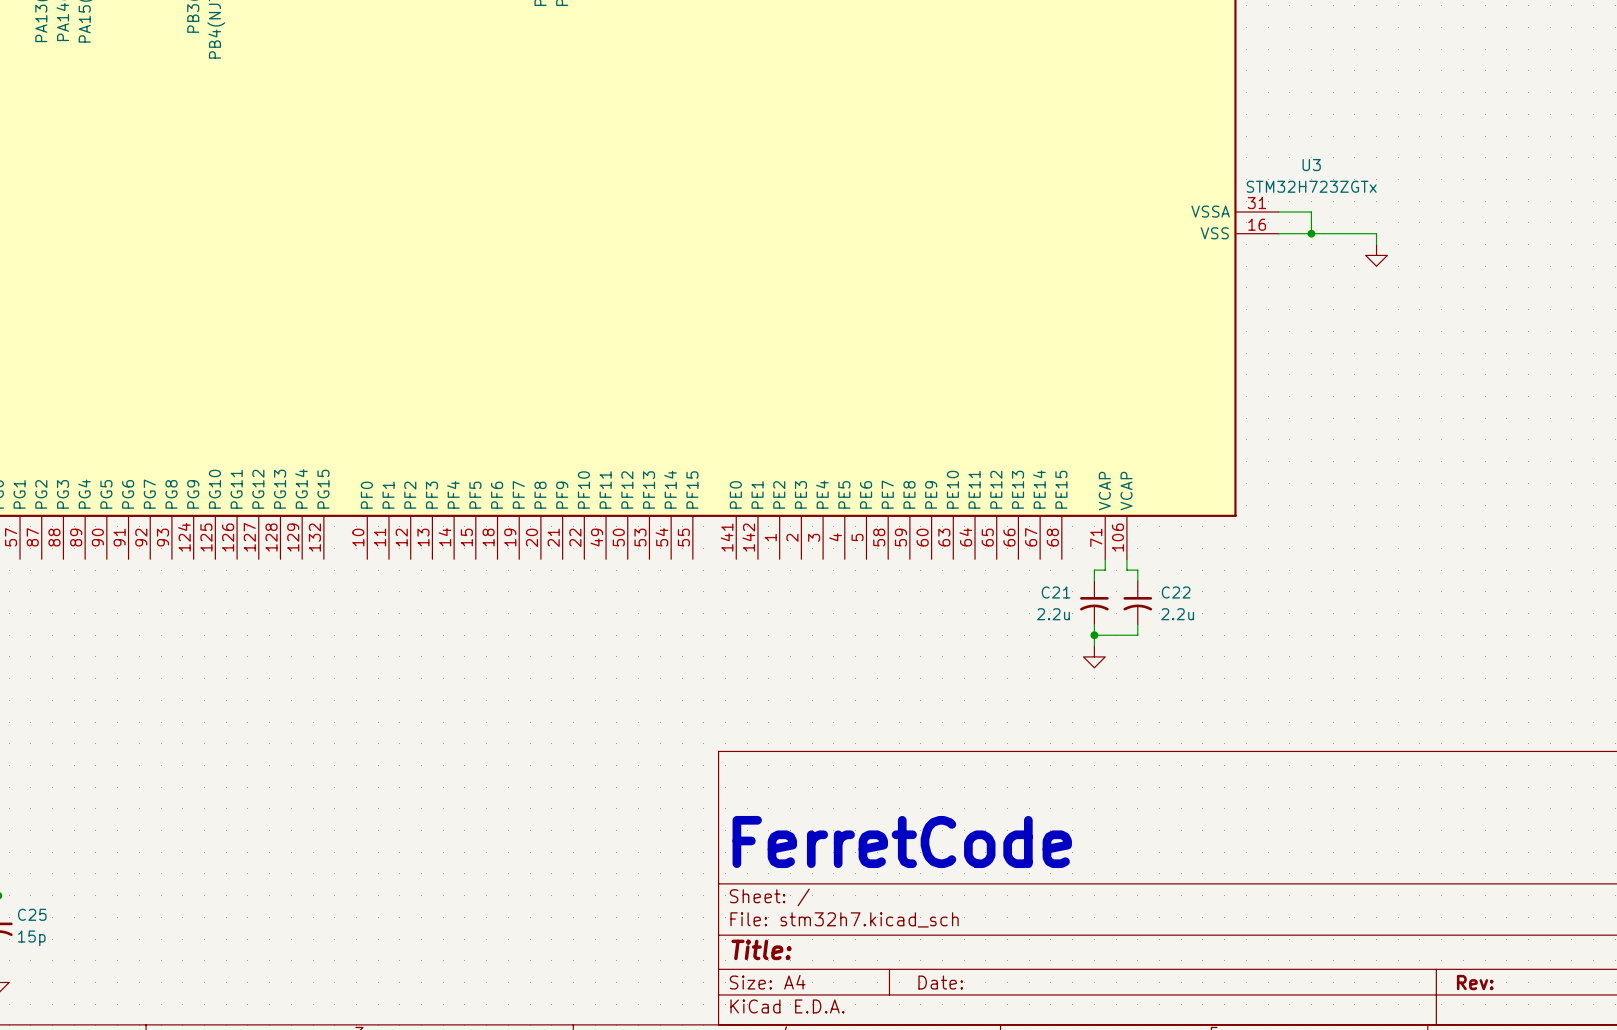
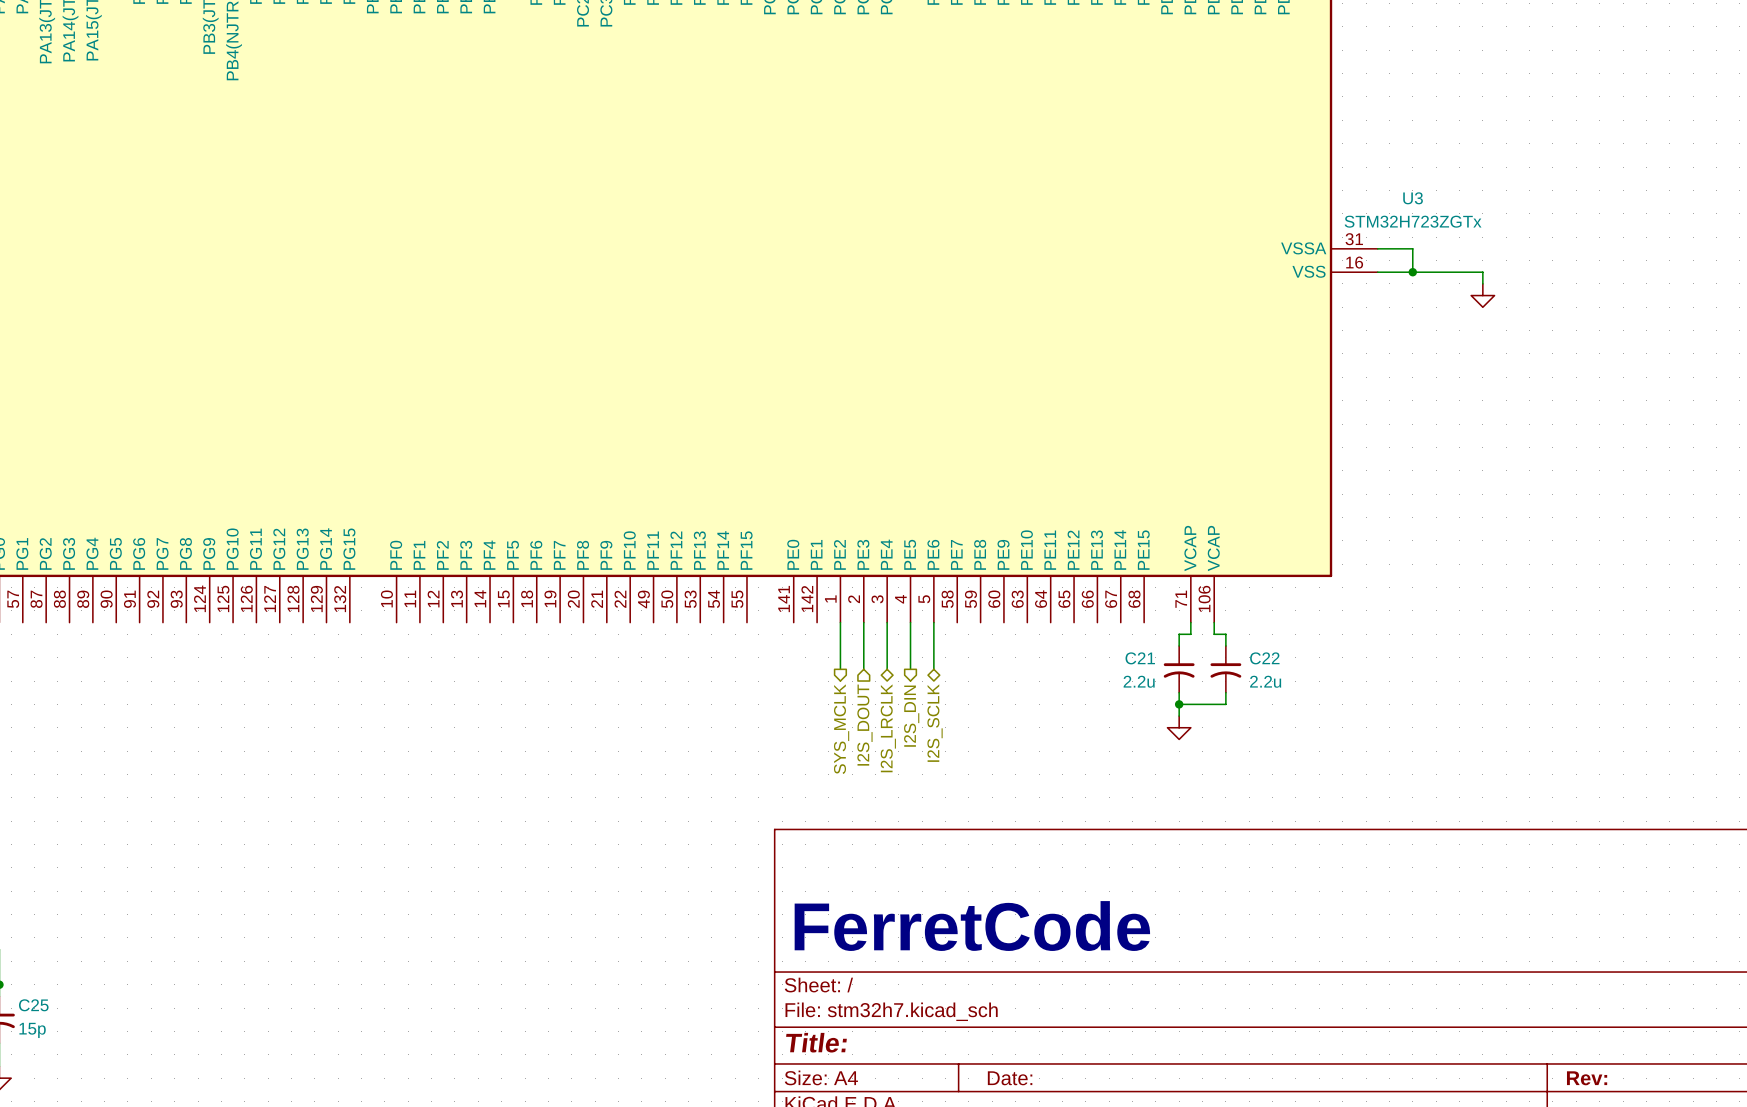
wire: none -> (840, 622) (840, 669)
wire: none -> (863, 622) (863, 669)
wire: none -> (887, 622) (887, 669)
wire: none -> (910, 622) (910, 669)
wire: none -> (933, 622) (933, 669)
hierarchical label: none -> I2S_DIN (911, 716)
hierarchical label: none -> I2S_DOUT (864, 725)
hierarchical label: none -> I2S_SCLK (935, 723)
hierarchical label: none -> SYS_MCLK (841, 729)
hierarchical label: none -> I2S_LRCLK (888, 728)

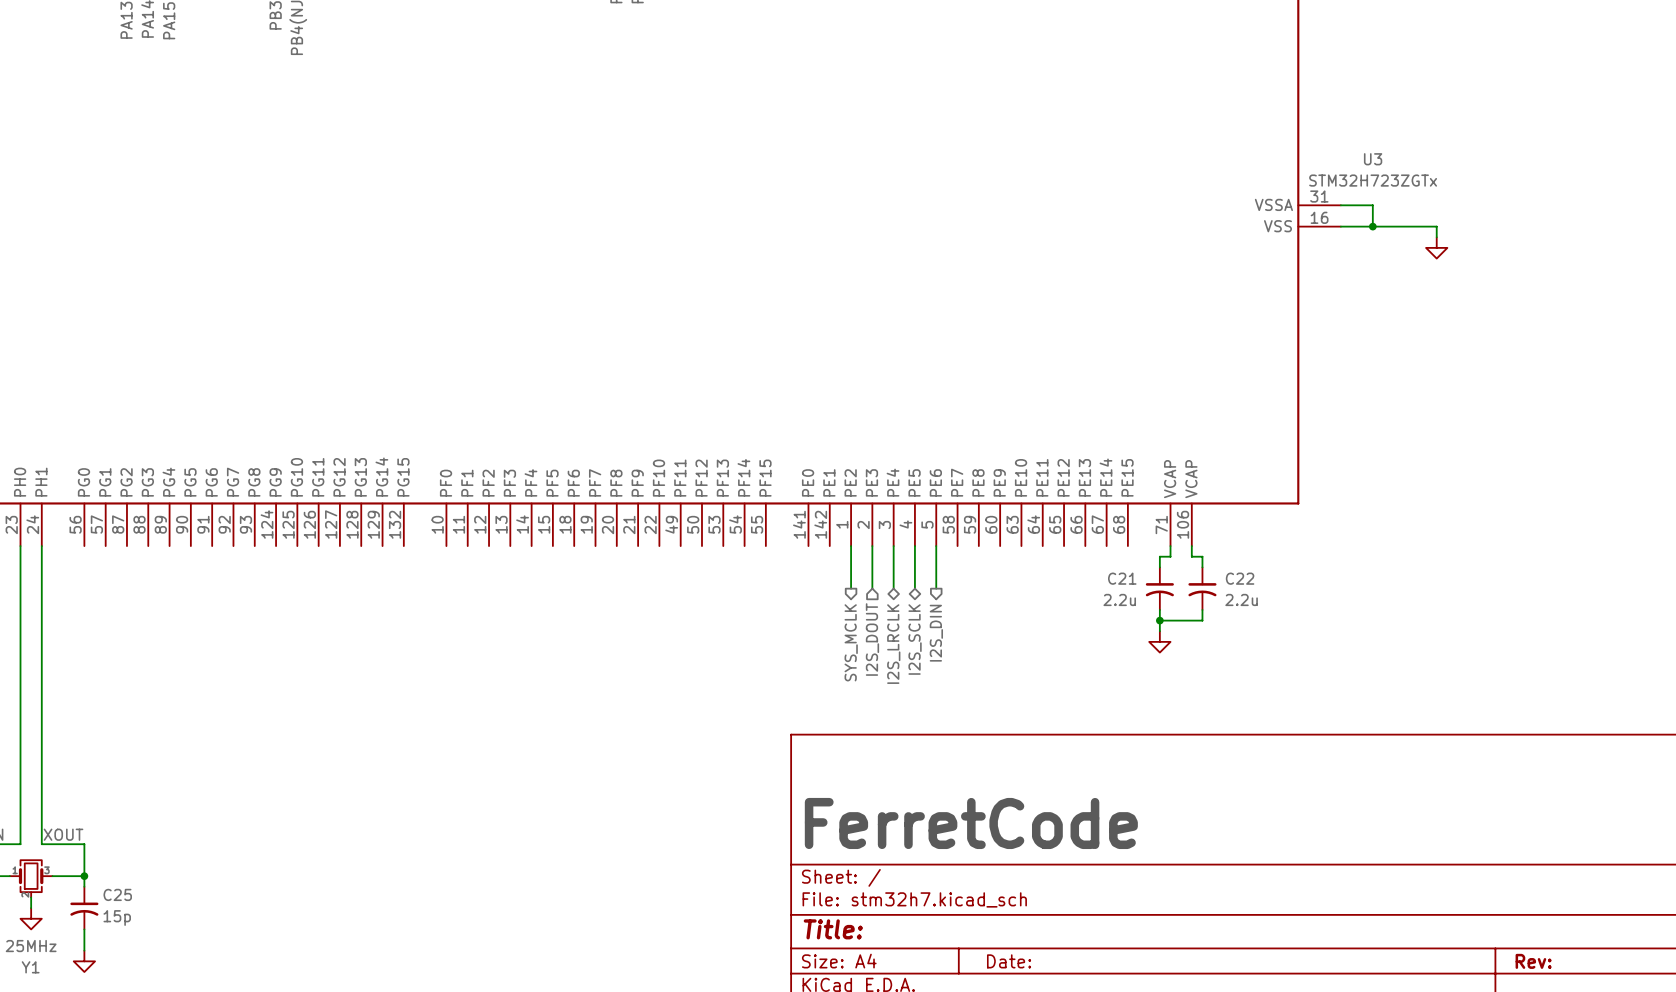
hierarchical label shape: output (911, 716) -> bidirectional (915, 639)
hierarchical label: I2S_DIN (911, 716) -> I2S_SCLK (915, 639)
hierarchical label shape: bidirectional (935, 723) -> output (936, 633)
hierarchical label: I2S_SCLK (935, 723) -> I2S_DIN (936, 633)

